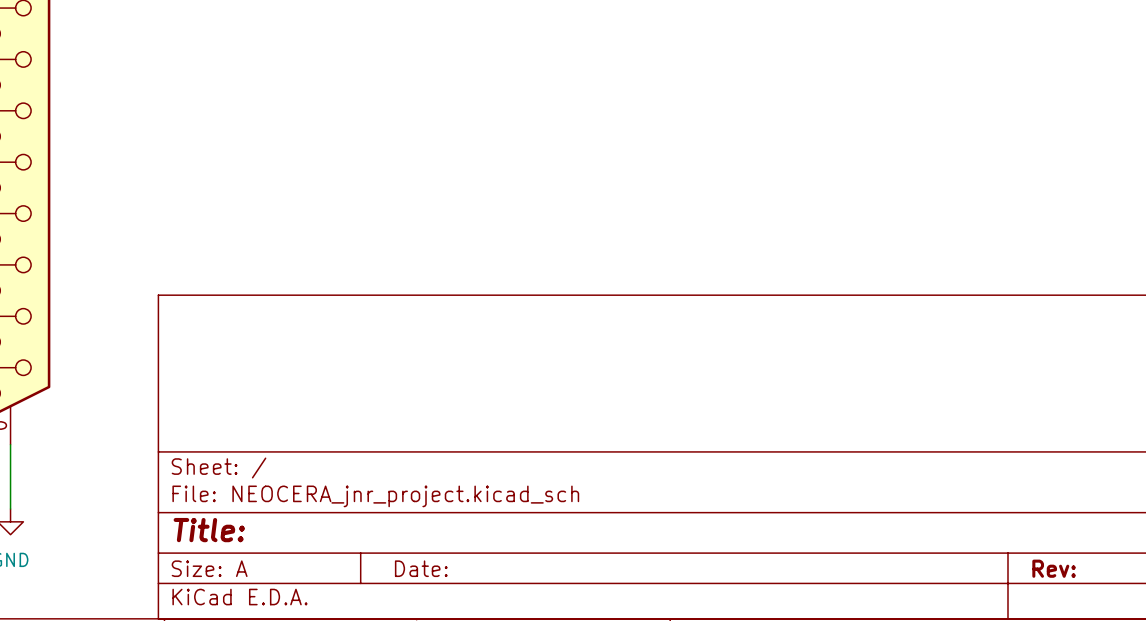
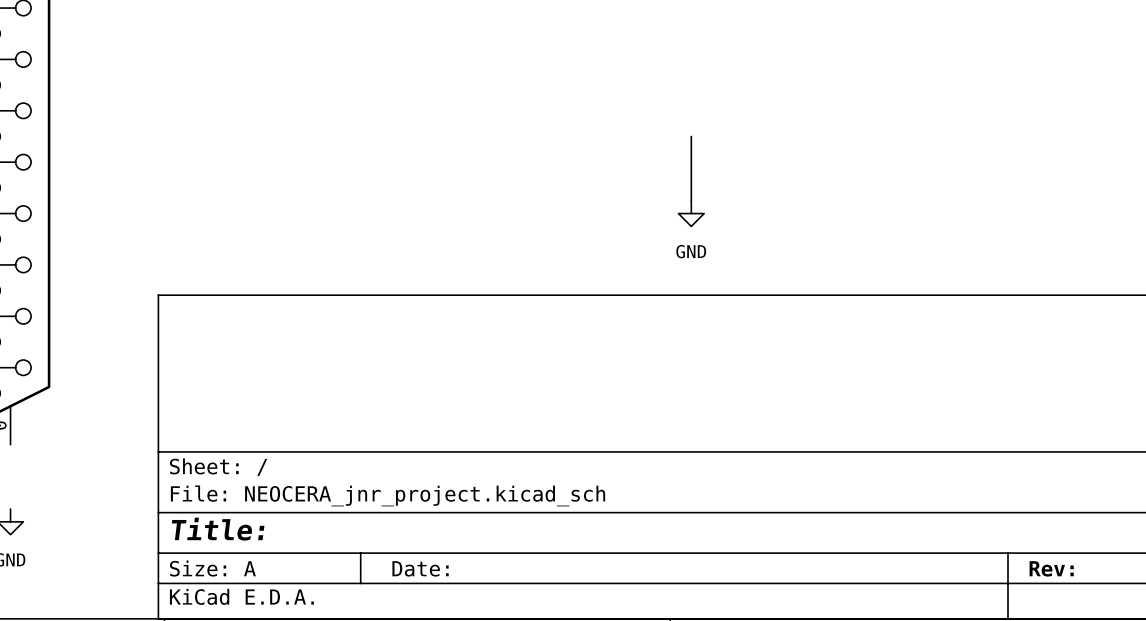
wire: none -> (691, 136) (691, 200)
power symbol: none -> GND (691, 213)
wire: (10, 444) (10, 509) -> none

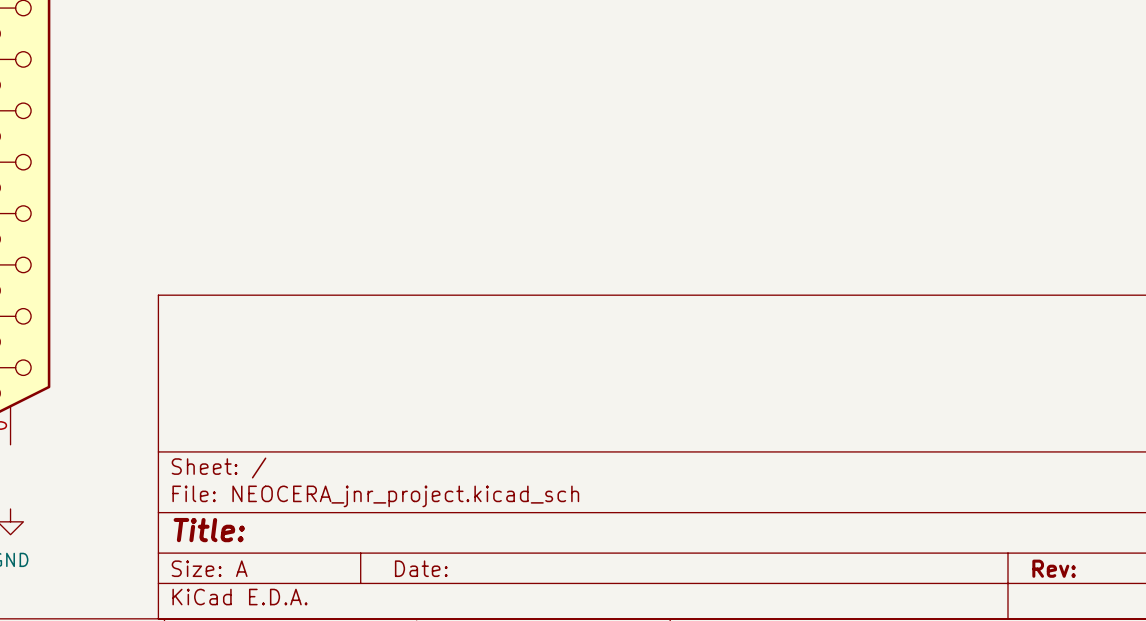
wire: (691, 136) (691, 200) -> none
power symbol: GND (691, 213) -> none

